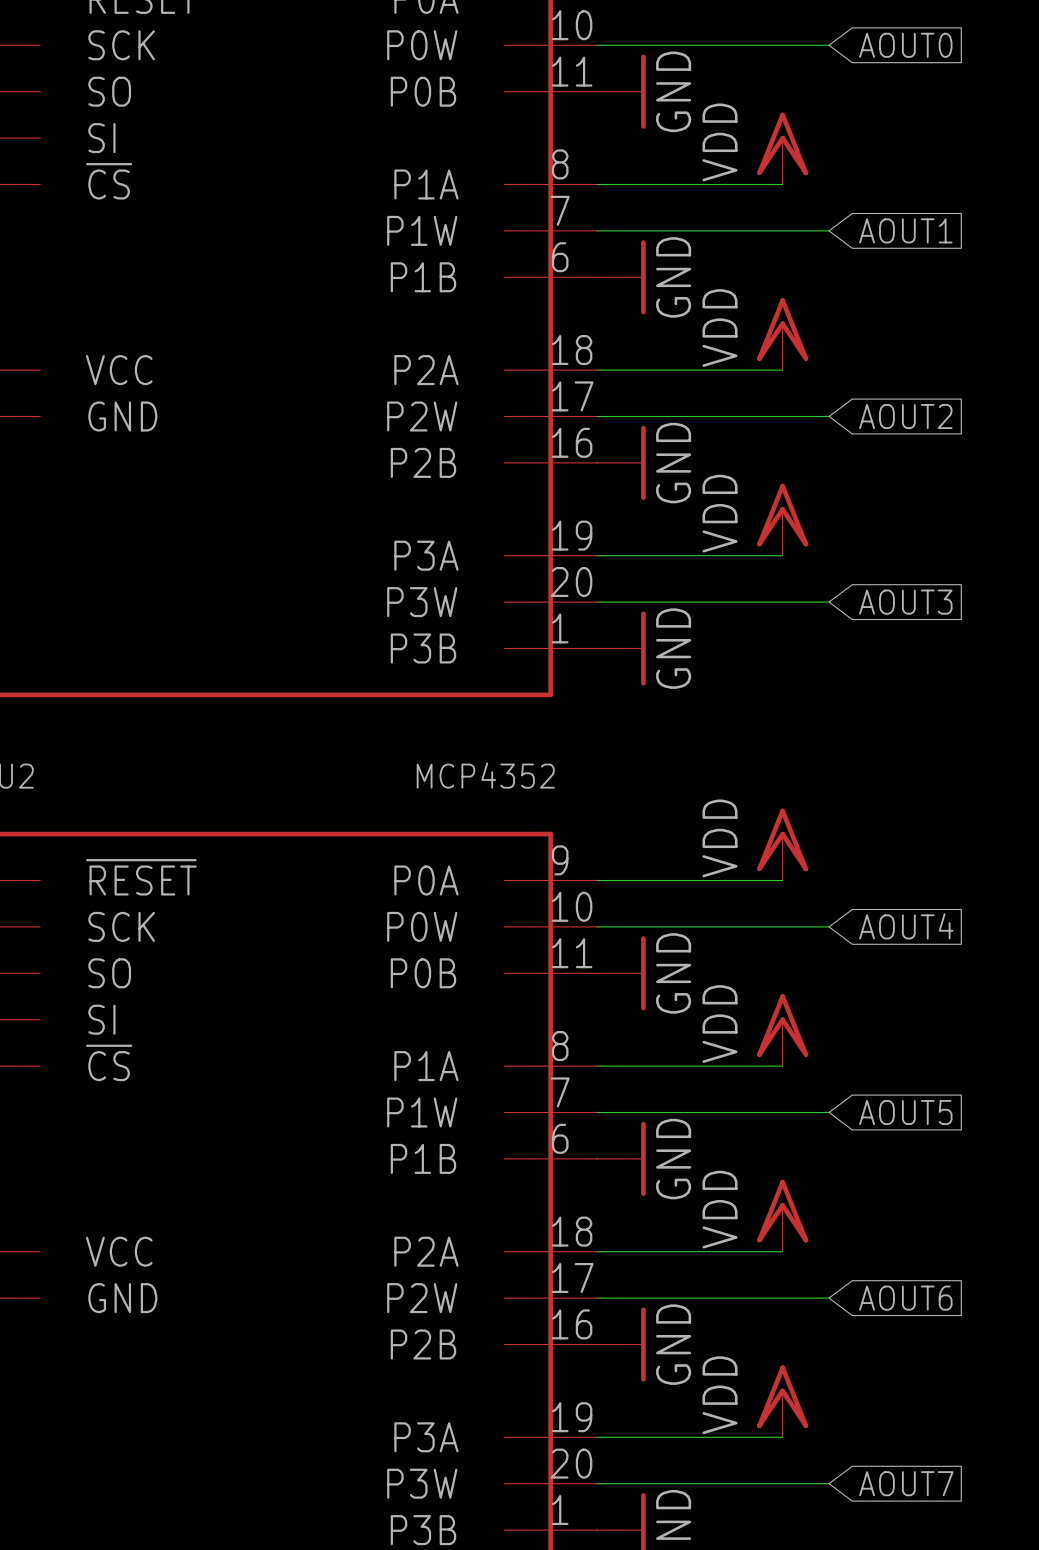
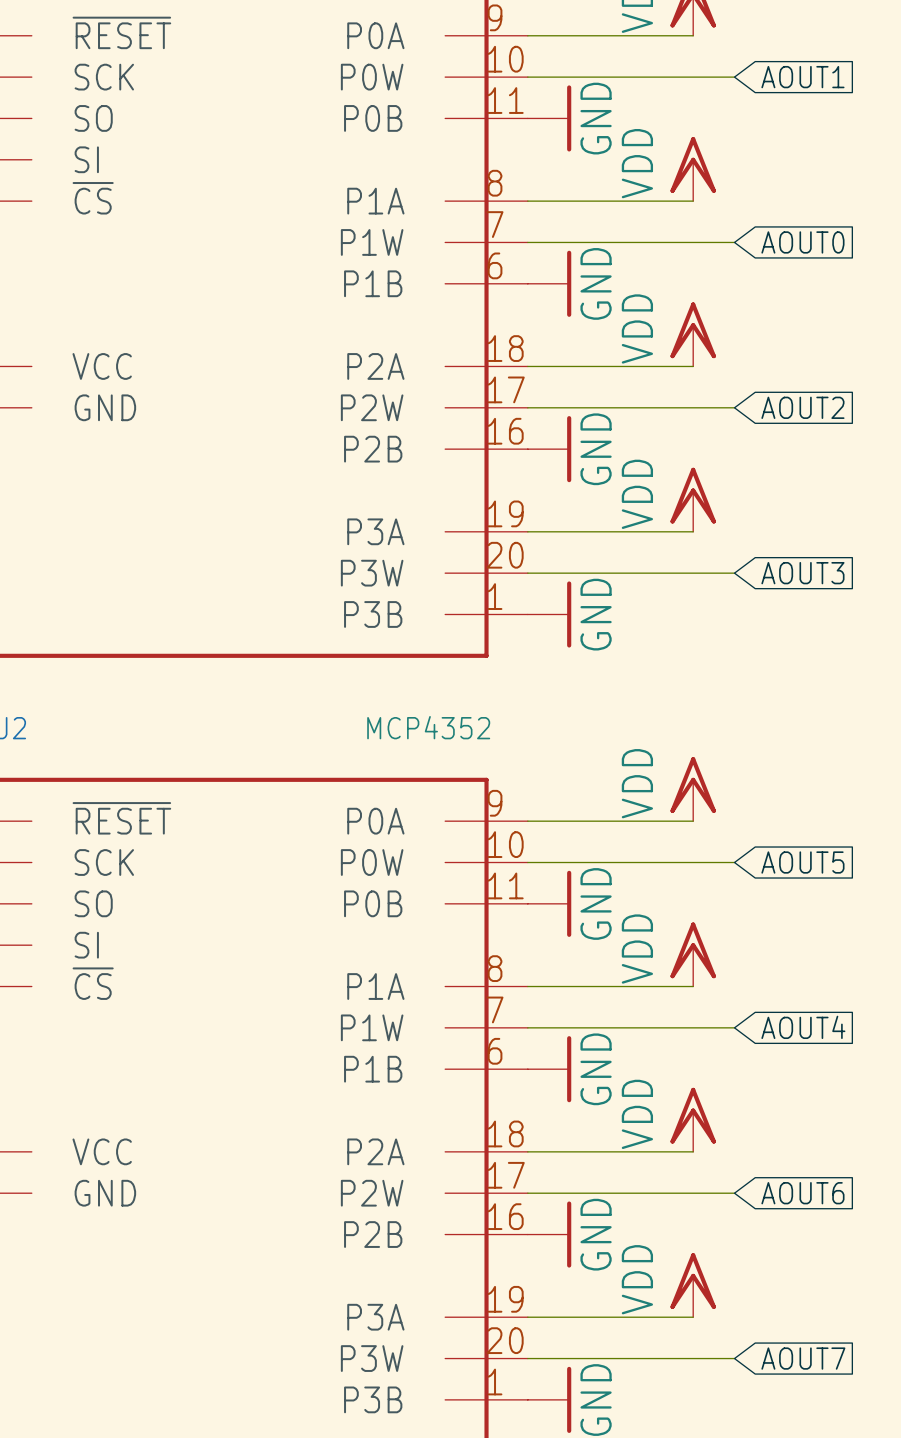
global label: AOUT0 (905, 45) -> AOUT1 (802, 77)
global label: AOUT1 (905, 230) -> AOUT0 (802, 242)
global label: AOUT4 (906, 926) -> AOUT5 (802, 862)
global label: AOUT5 (905, 1112) -> AOUT4 (803, 1027)

